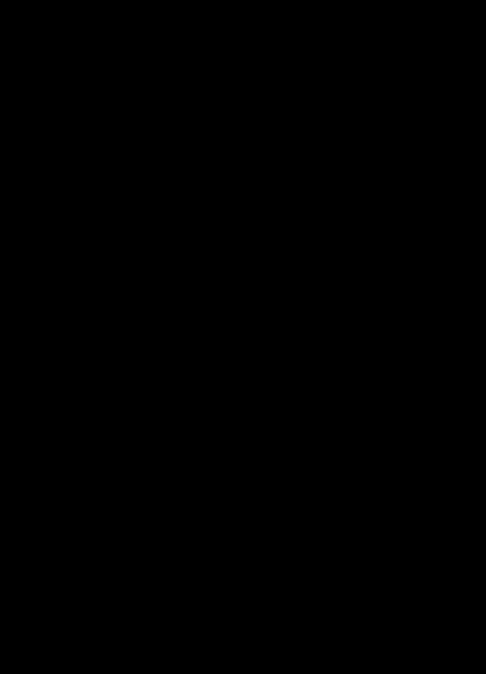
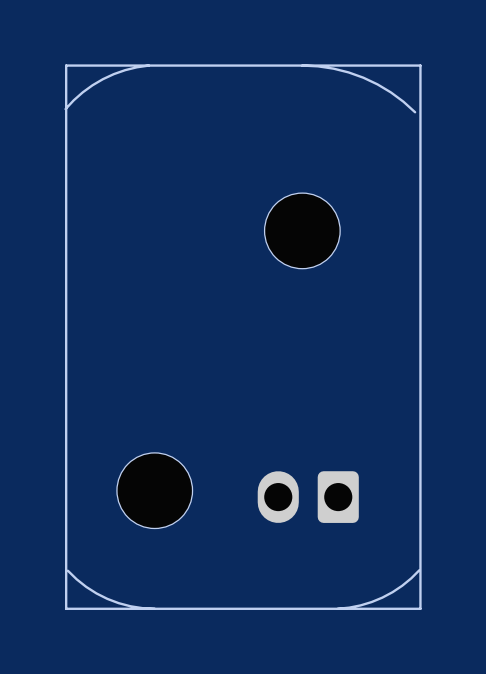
board edge: none -> (148, 65) (125, 70) (102, 79) (82, 92) (65, 109)
board edge: none -> (302, 65) (333, 68) (363, 77) (390, 92) (415, 112)
board edge: none -> (420, 65) (66, 65) (66, 608) (420, 608) (420, 65)
part: none -> (302, 230)
part: none -> (154, 490)
part: none -> (308, 497)
board edge: none -> (67, 570) (86, 586) (107, 598) (130, 606) (154, 608)
board edge: none -> (419, 570) (402, 585) (382, 597) (360, 605) (337, 608)

